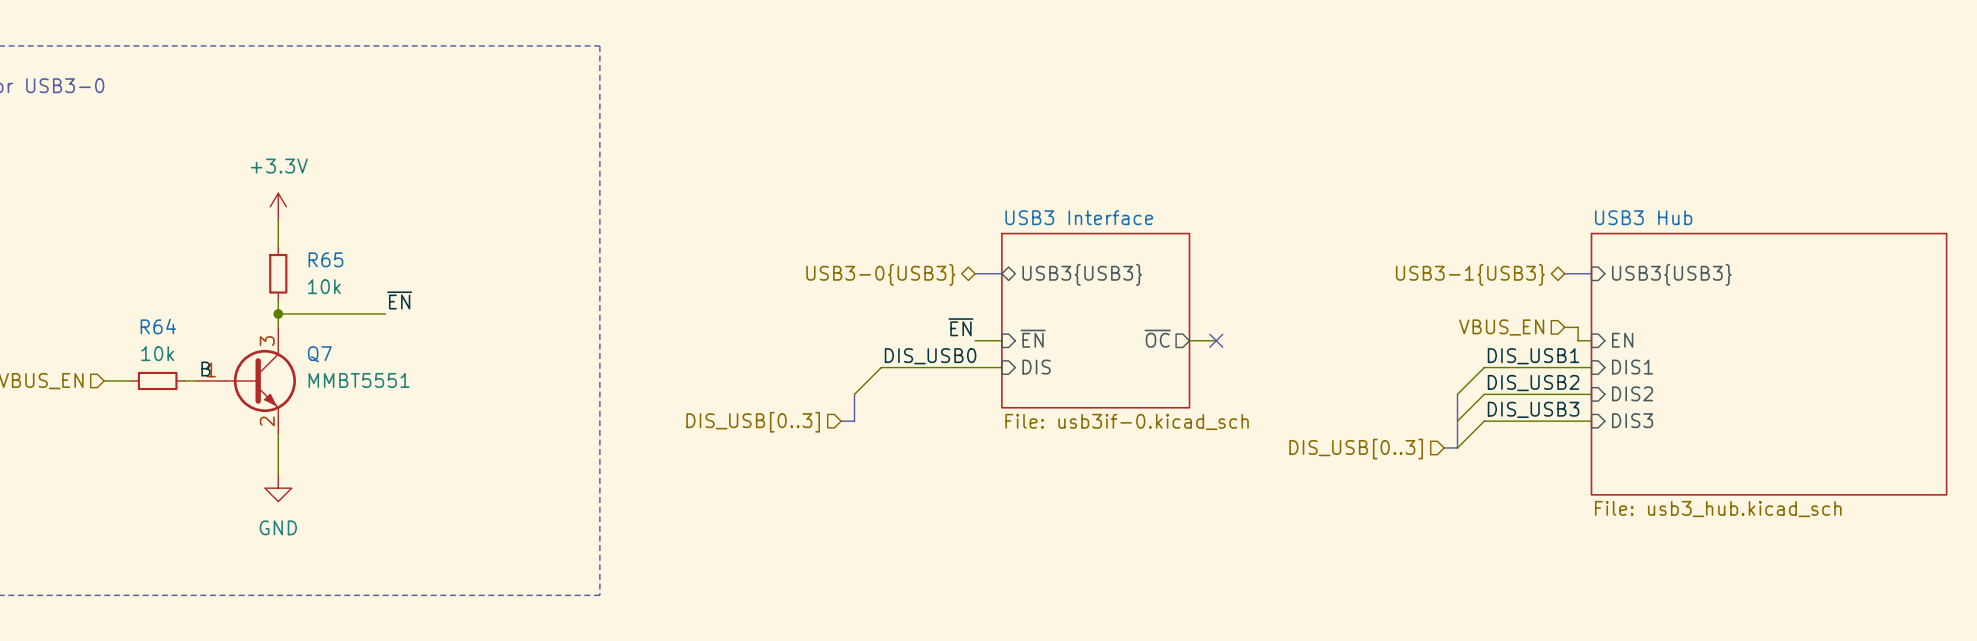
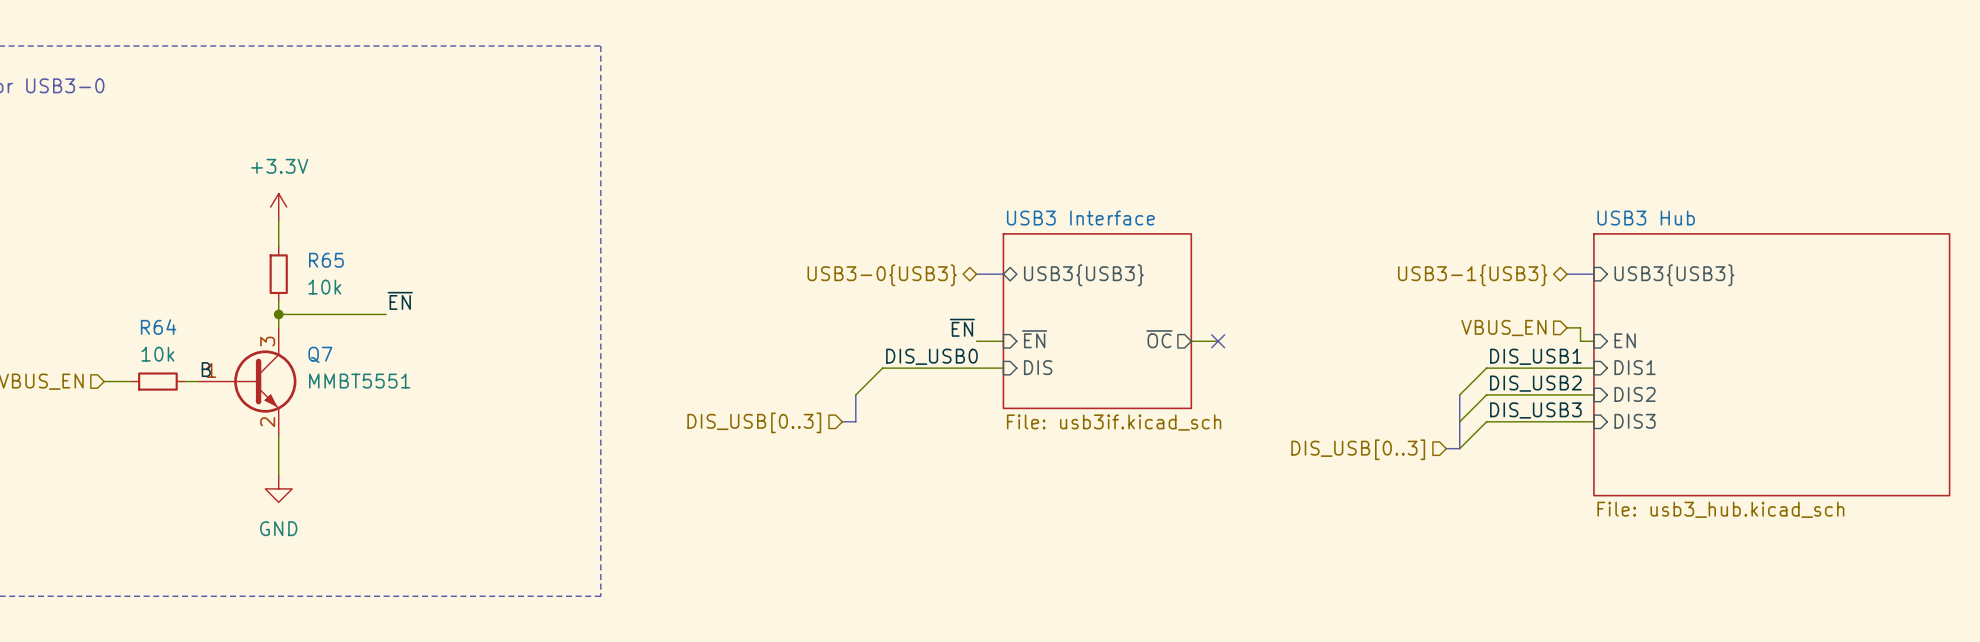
sheet USB3 Interface value: File: usb3if-0.kicad_sch (1127, 421) -> File: usb3if.kicad_sch (1114, 422)

